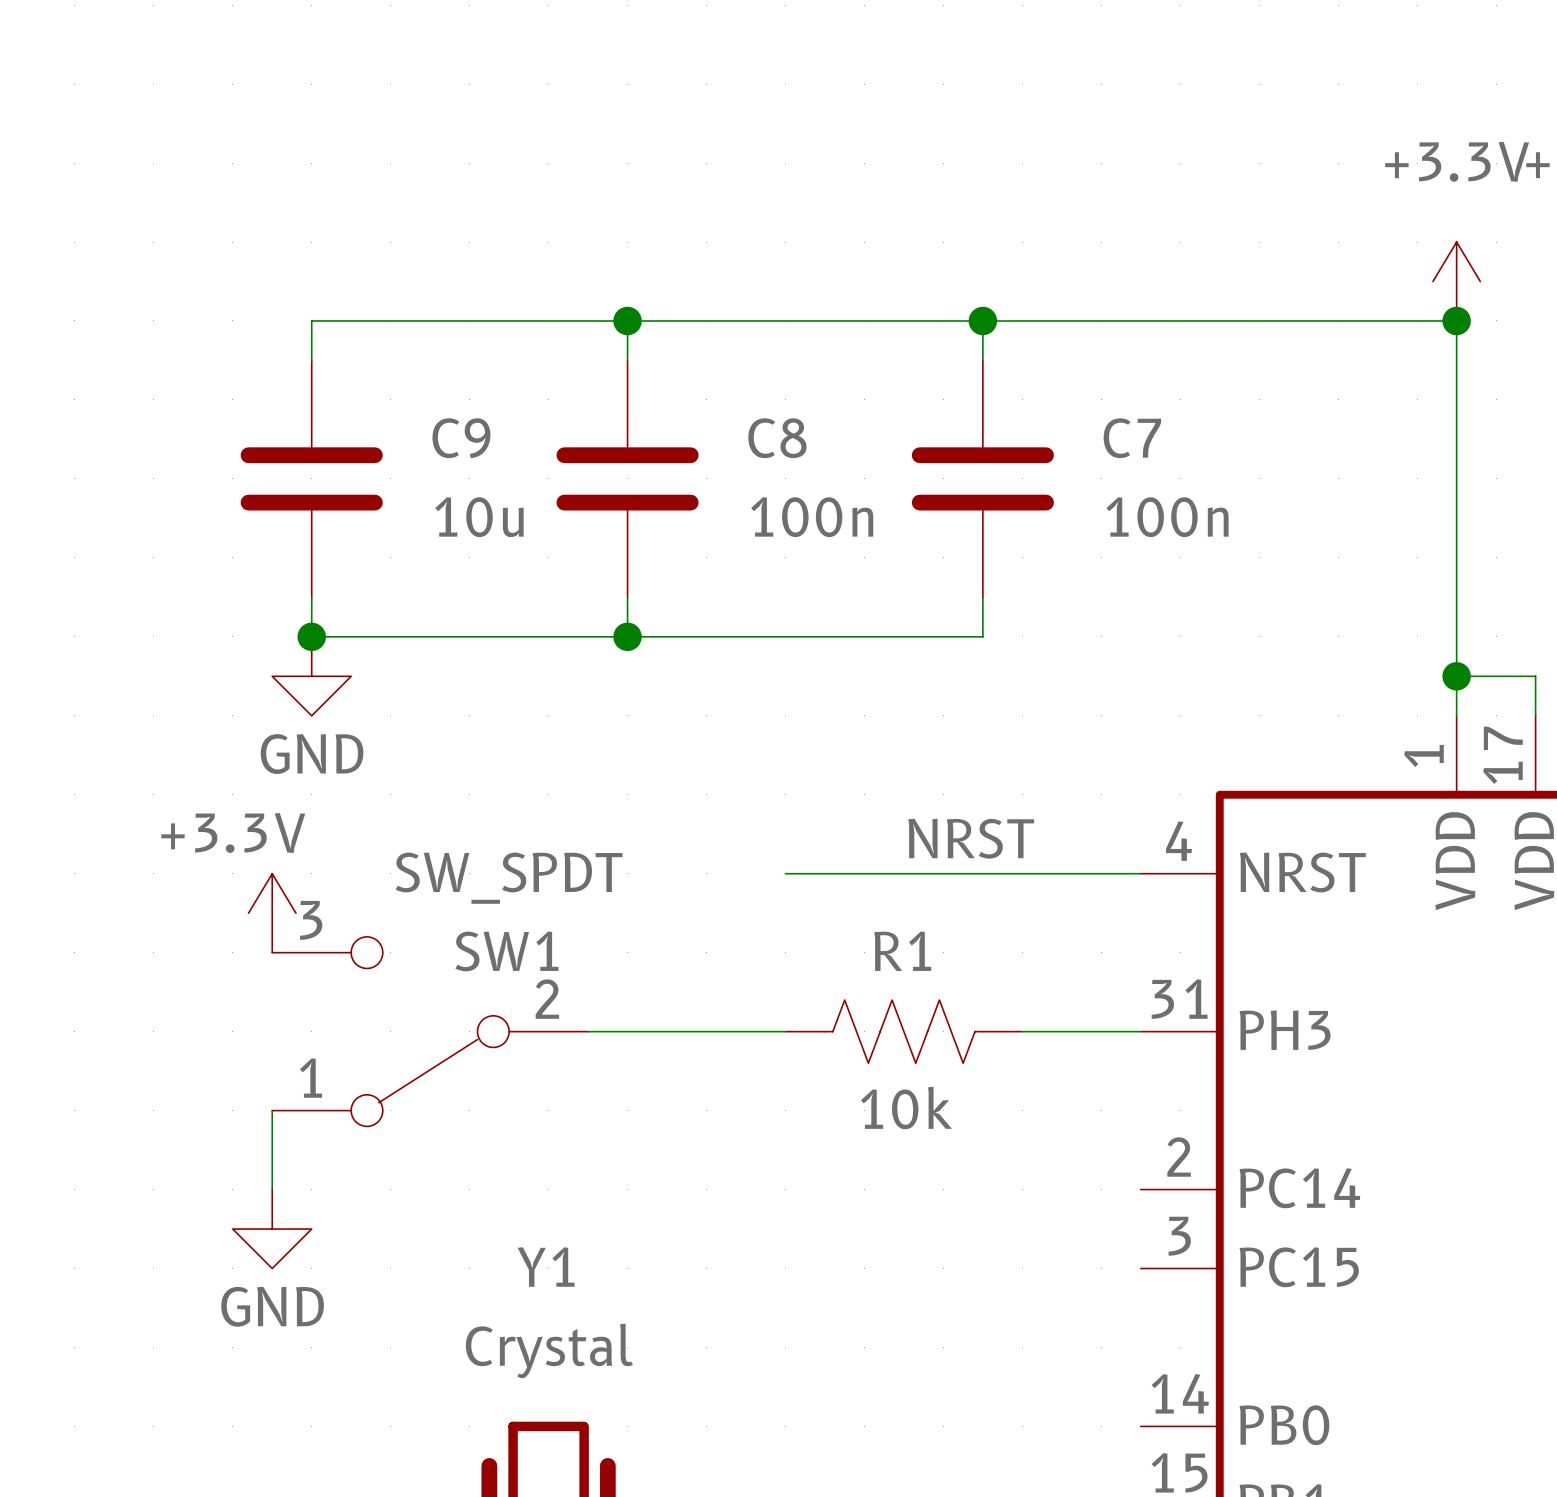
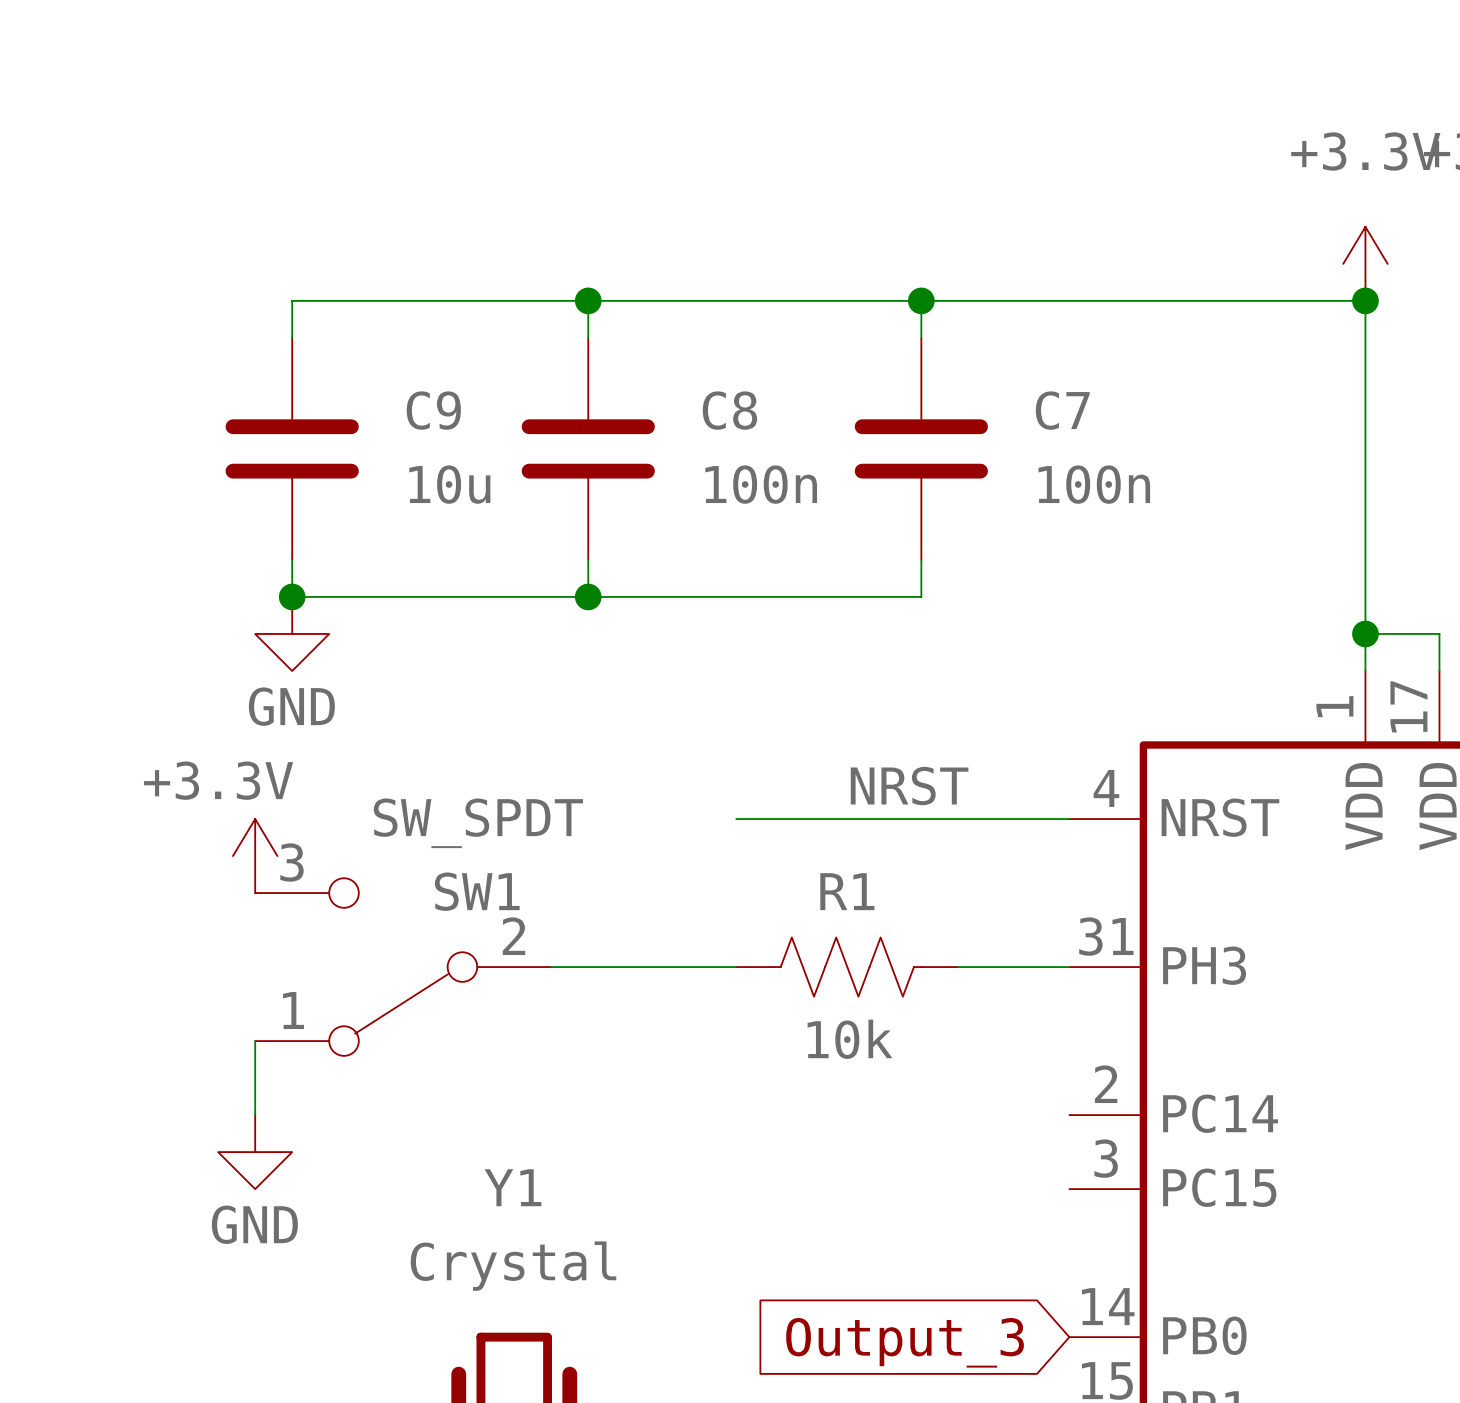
global label: none -> Output_3 (905, 1342)

